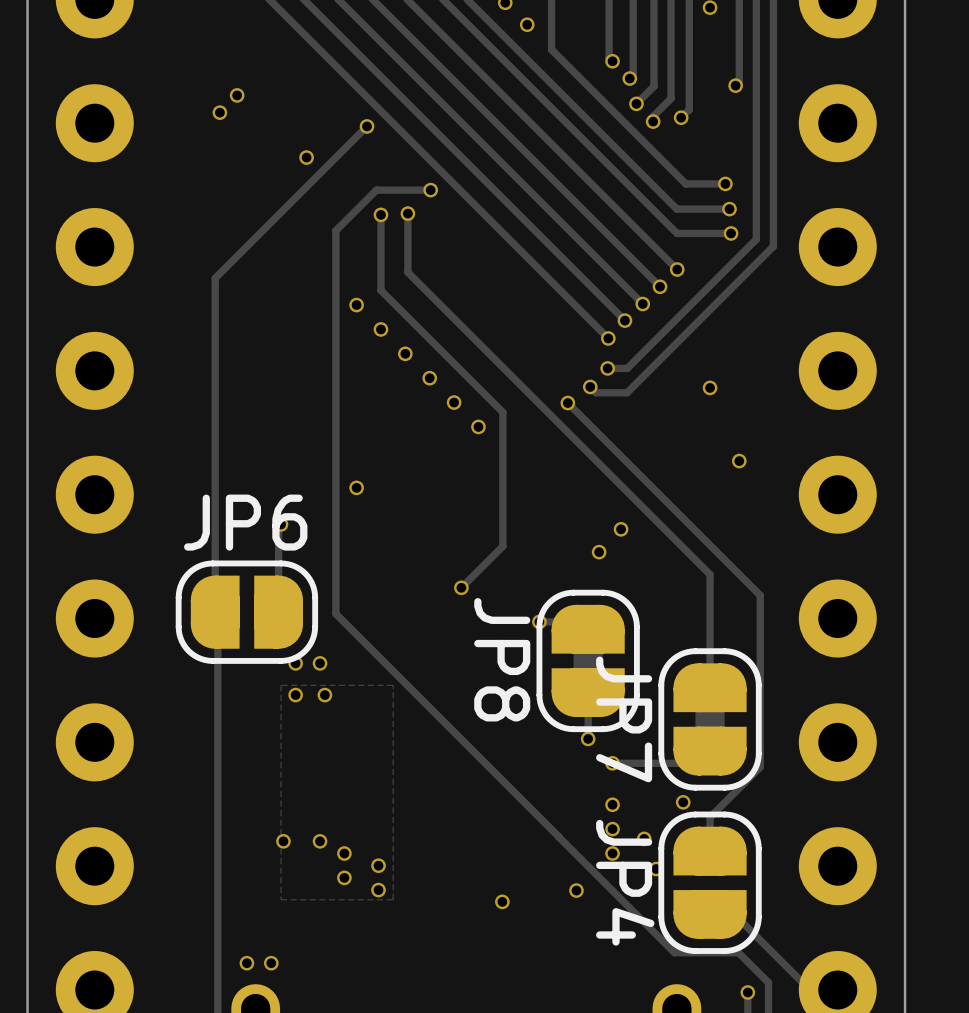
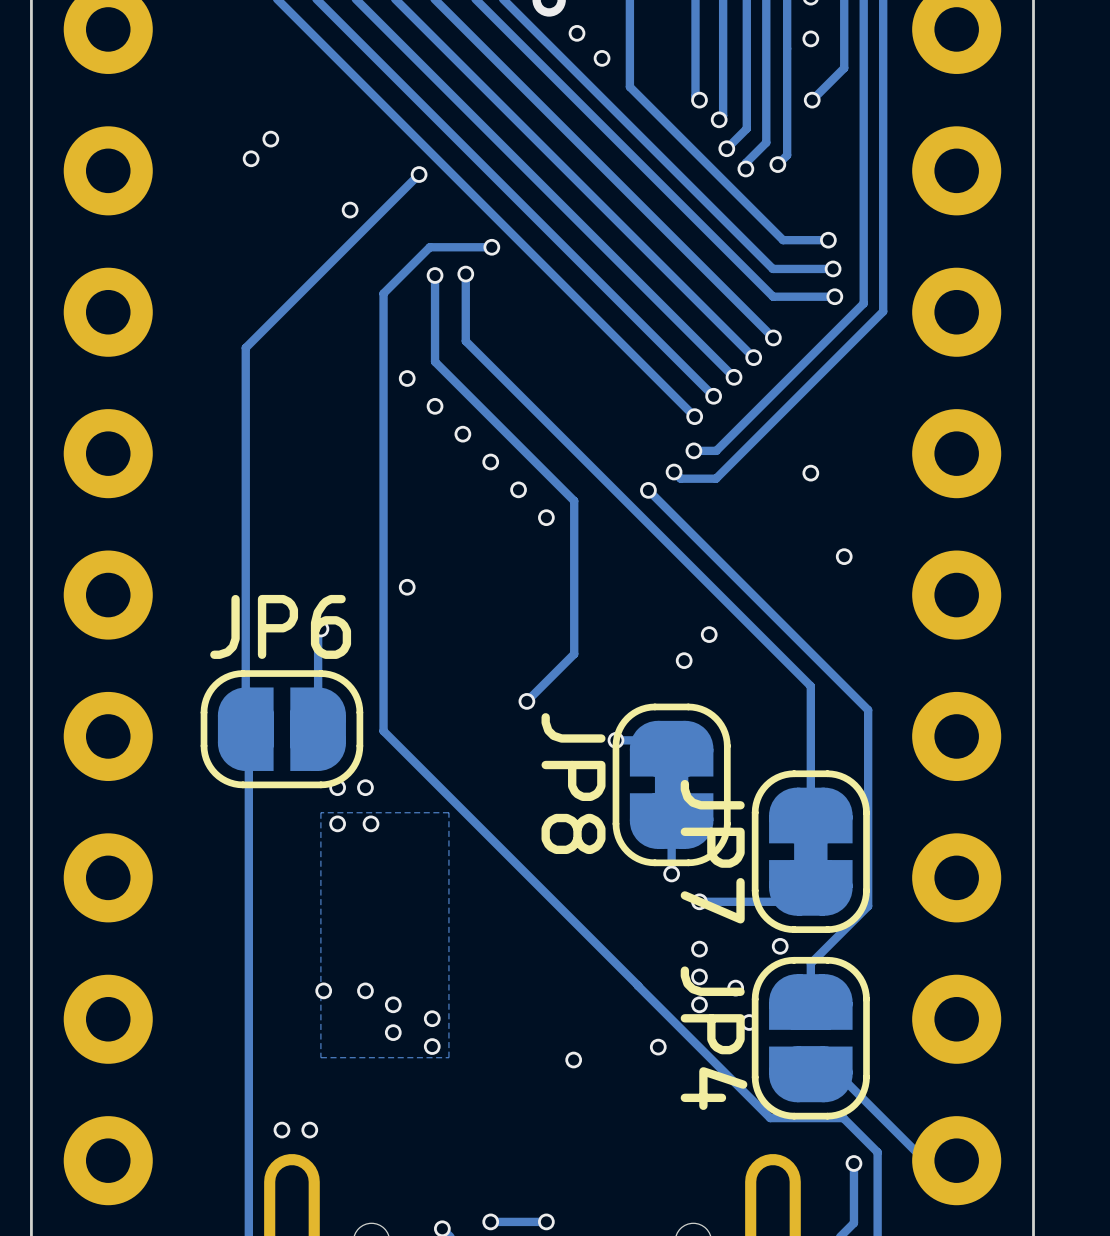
track: (739, 33) (739, 82) (735, 85) -> (844, 68) (812, 100)
via position: (735, 85) -> (812, 100)

